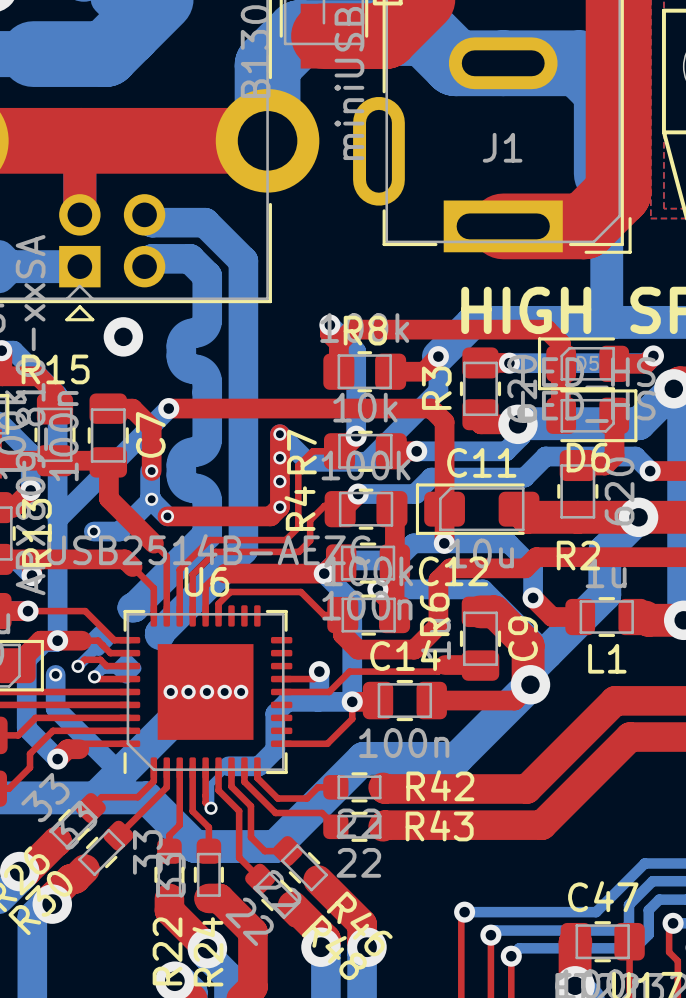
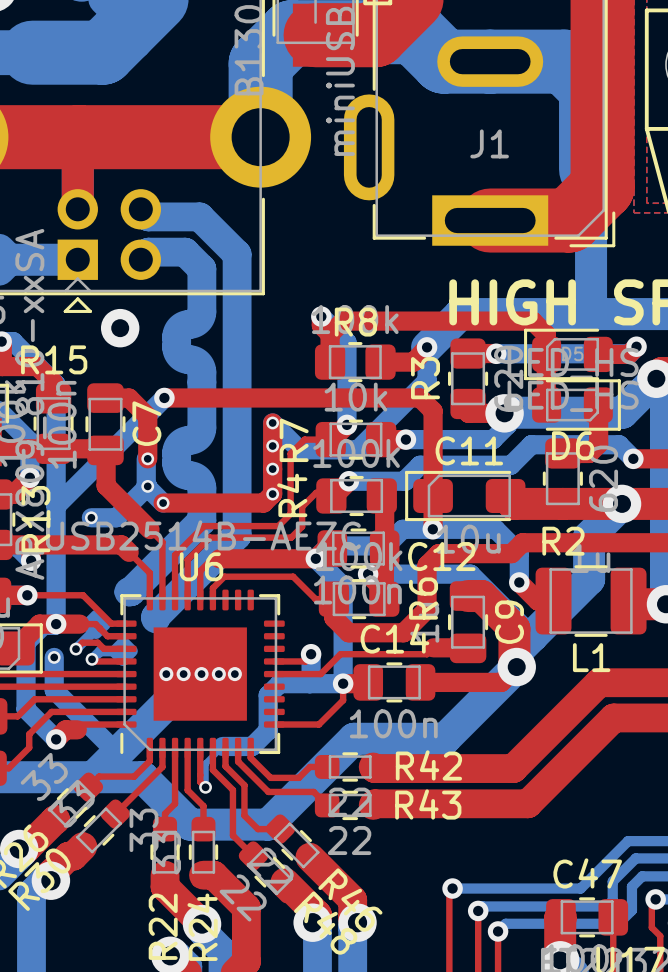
L1 footprint: [565, 597, 649, 637] -> [535, 565, 647, 637]
L1 name position: L1 (607, 658) -> L1 (591, 657)

